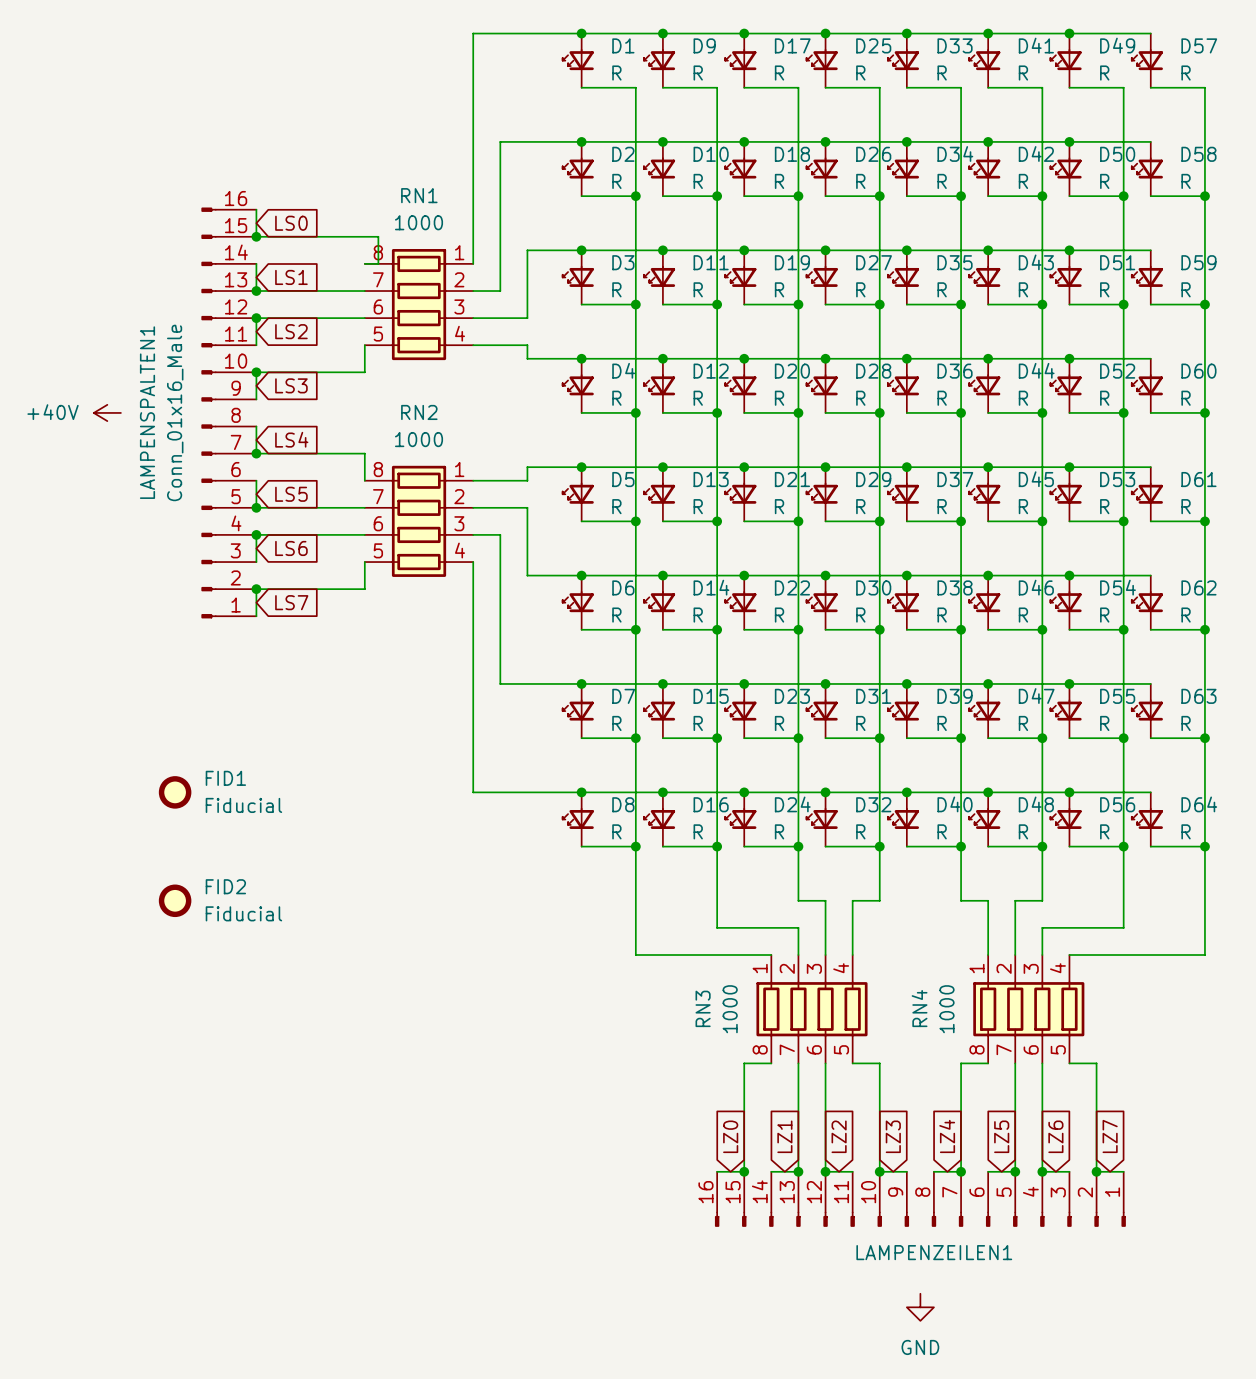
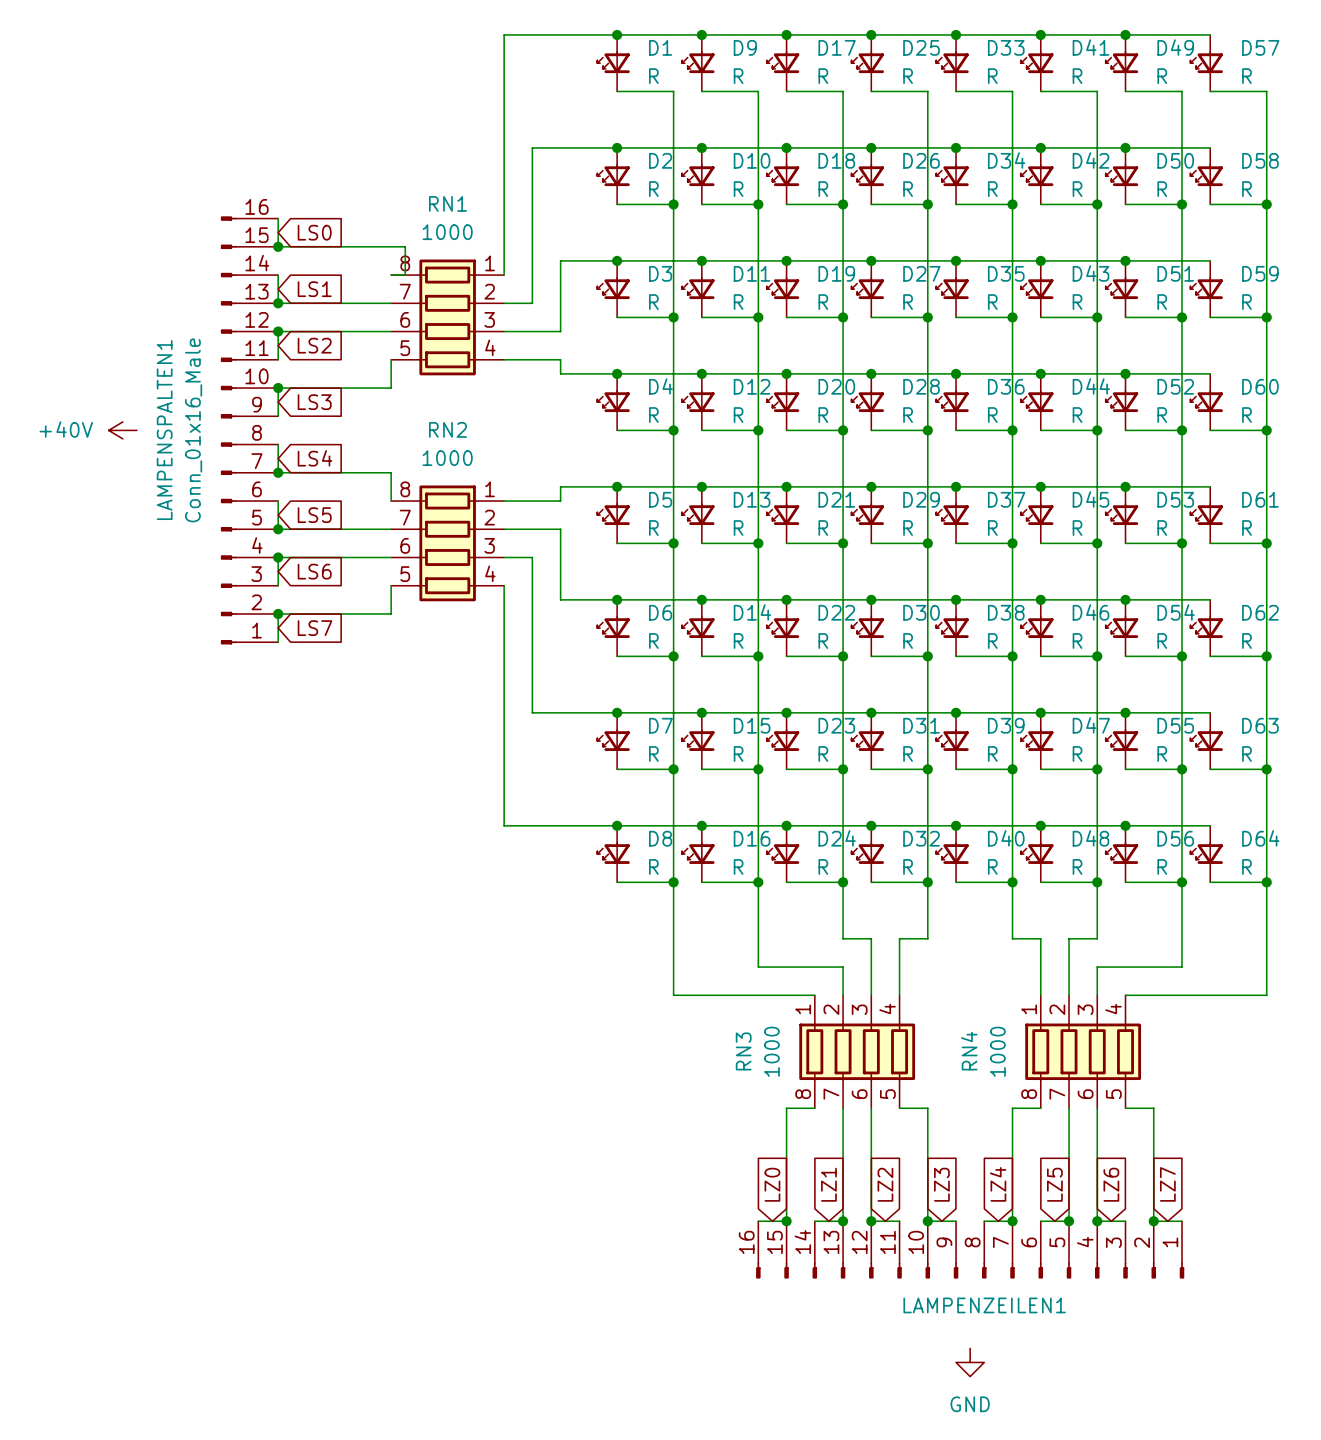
FID1: Fiducial (175, 792) -> none
FID2: Fiducial (175, 900) -> none

